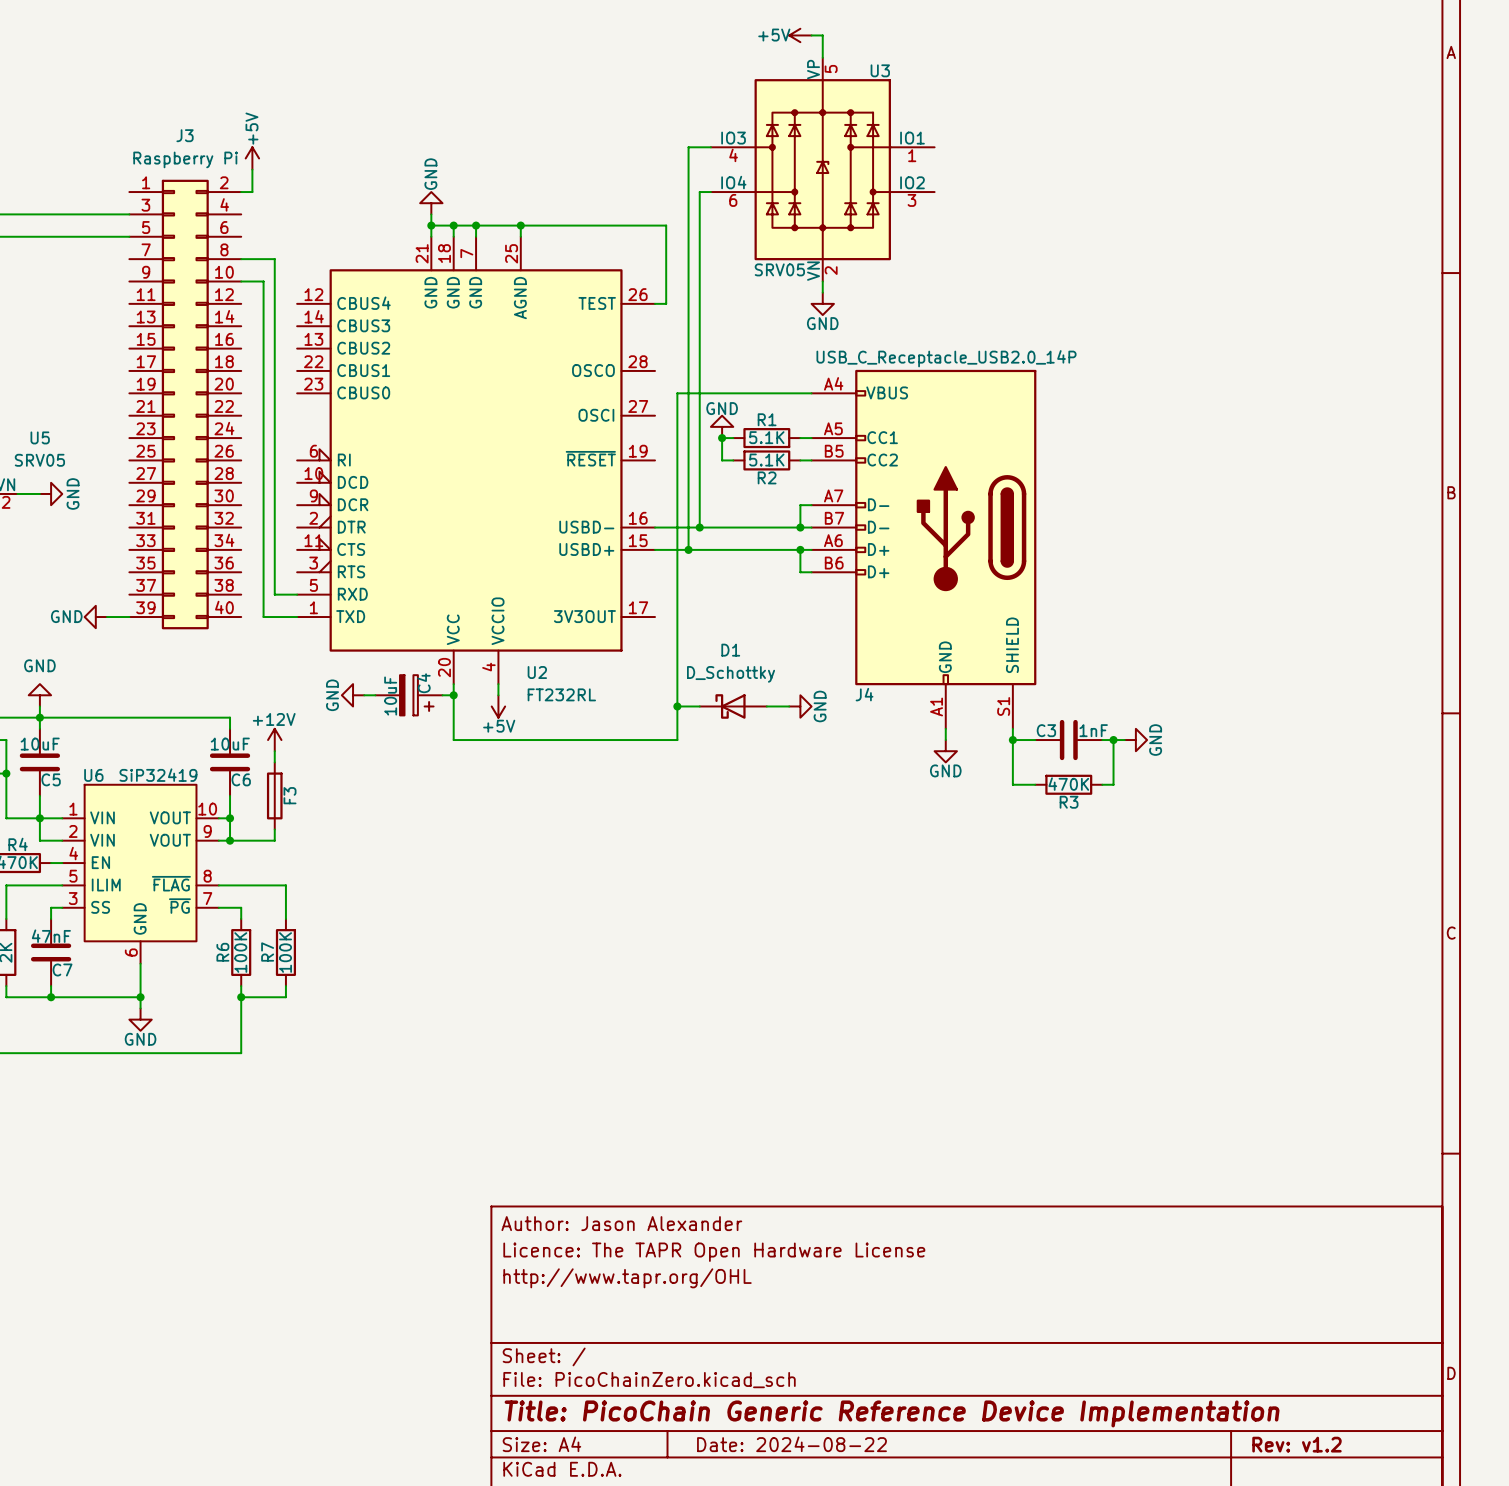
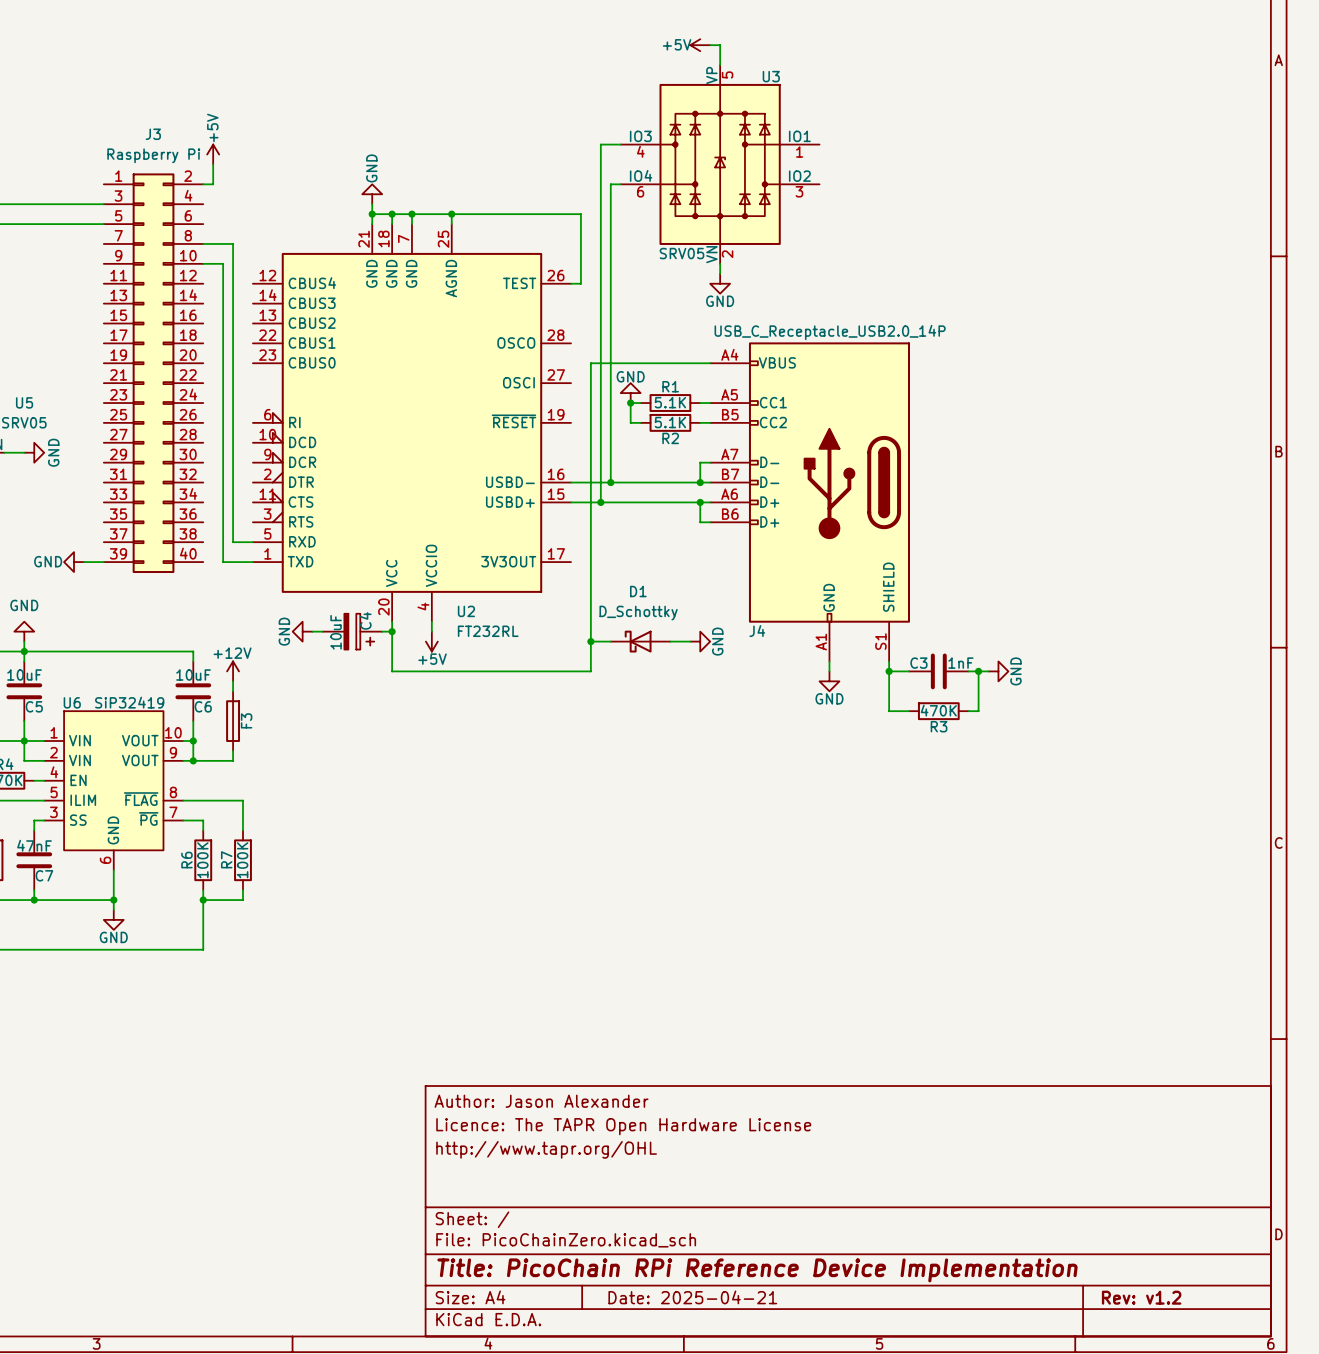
title block: Title: PicoChain Generic Reference Device Implementation (892, 1413) -> Title: PicoChain RPi Reference Device Implementation (757, 1270)
title block: Date: 2024-08-22 (791, 1444) -> Date: 2025-04-21 (692, 1297)

